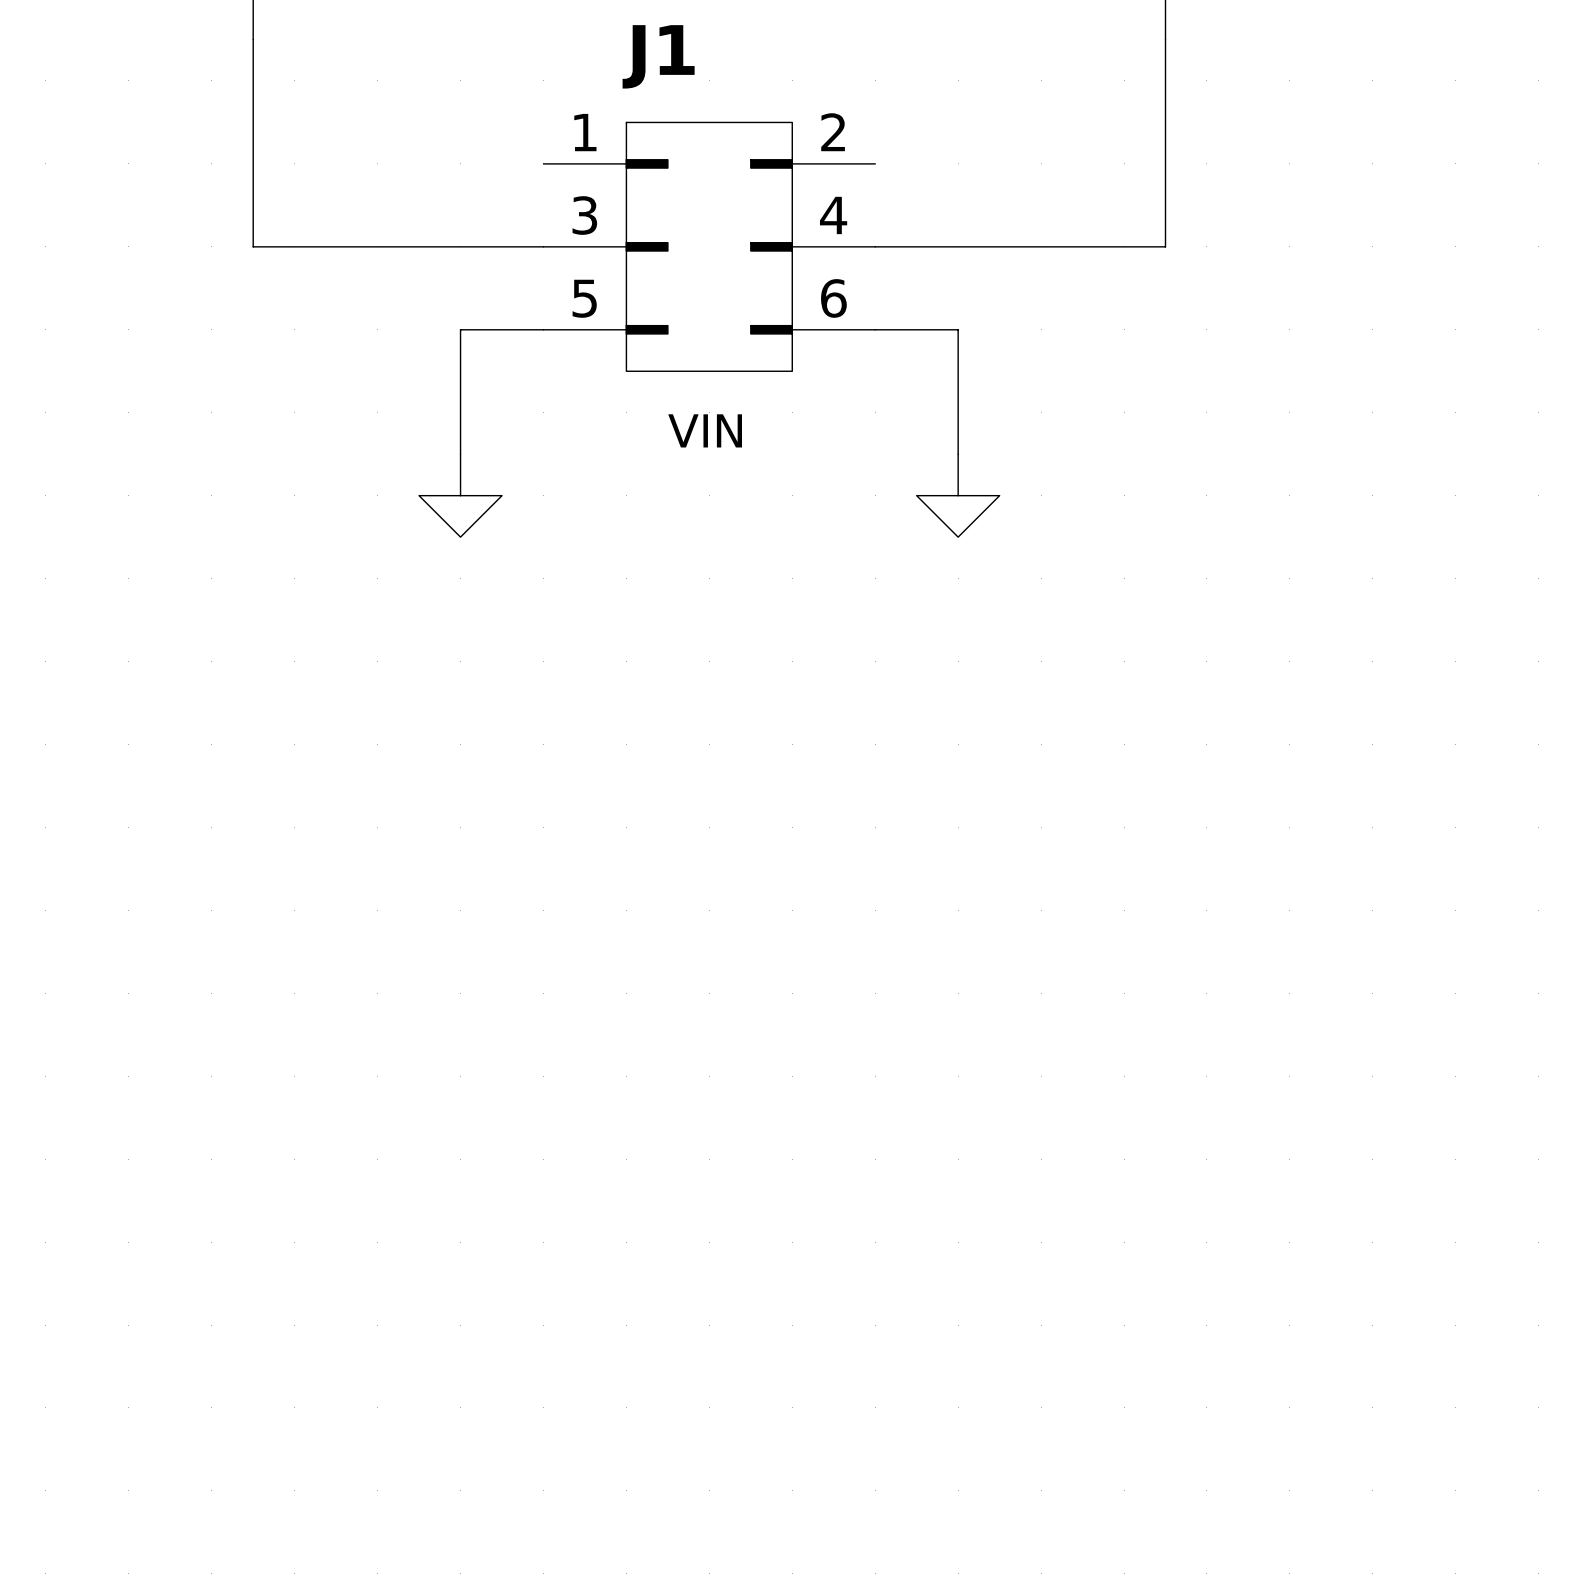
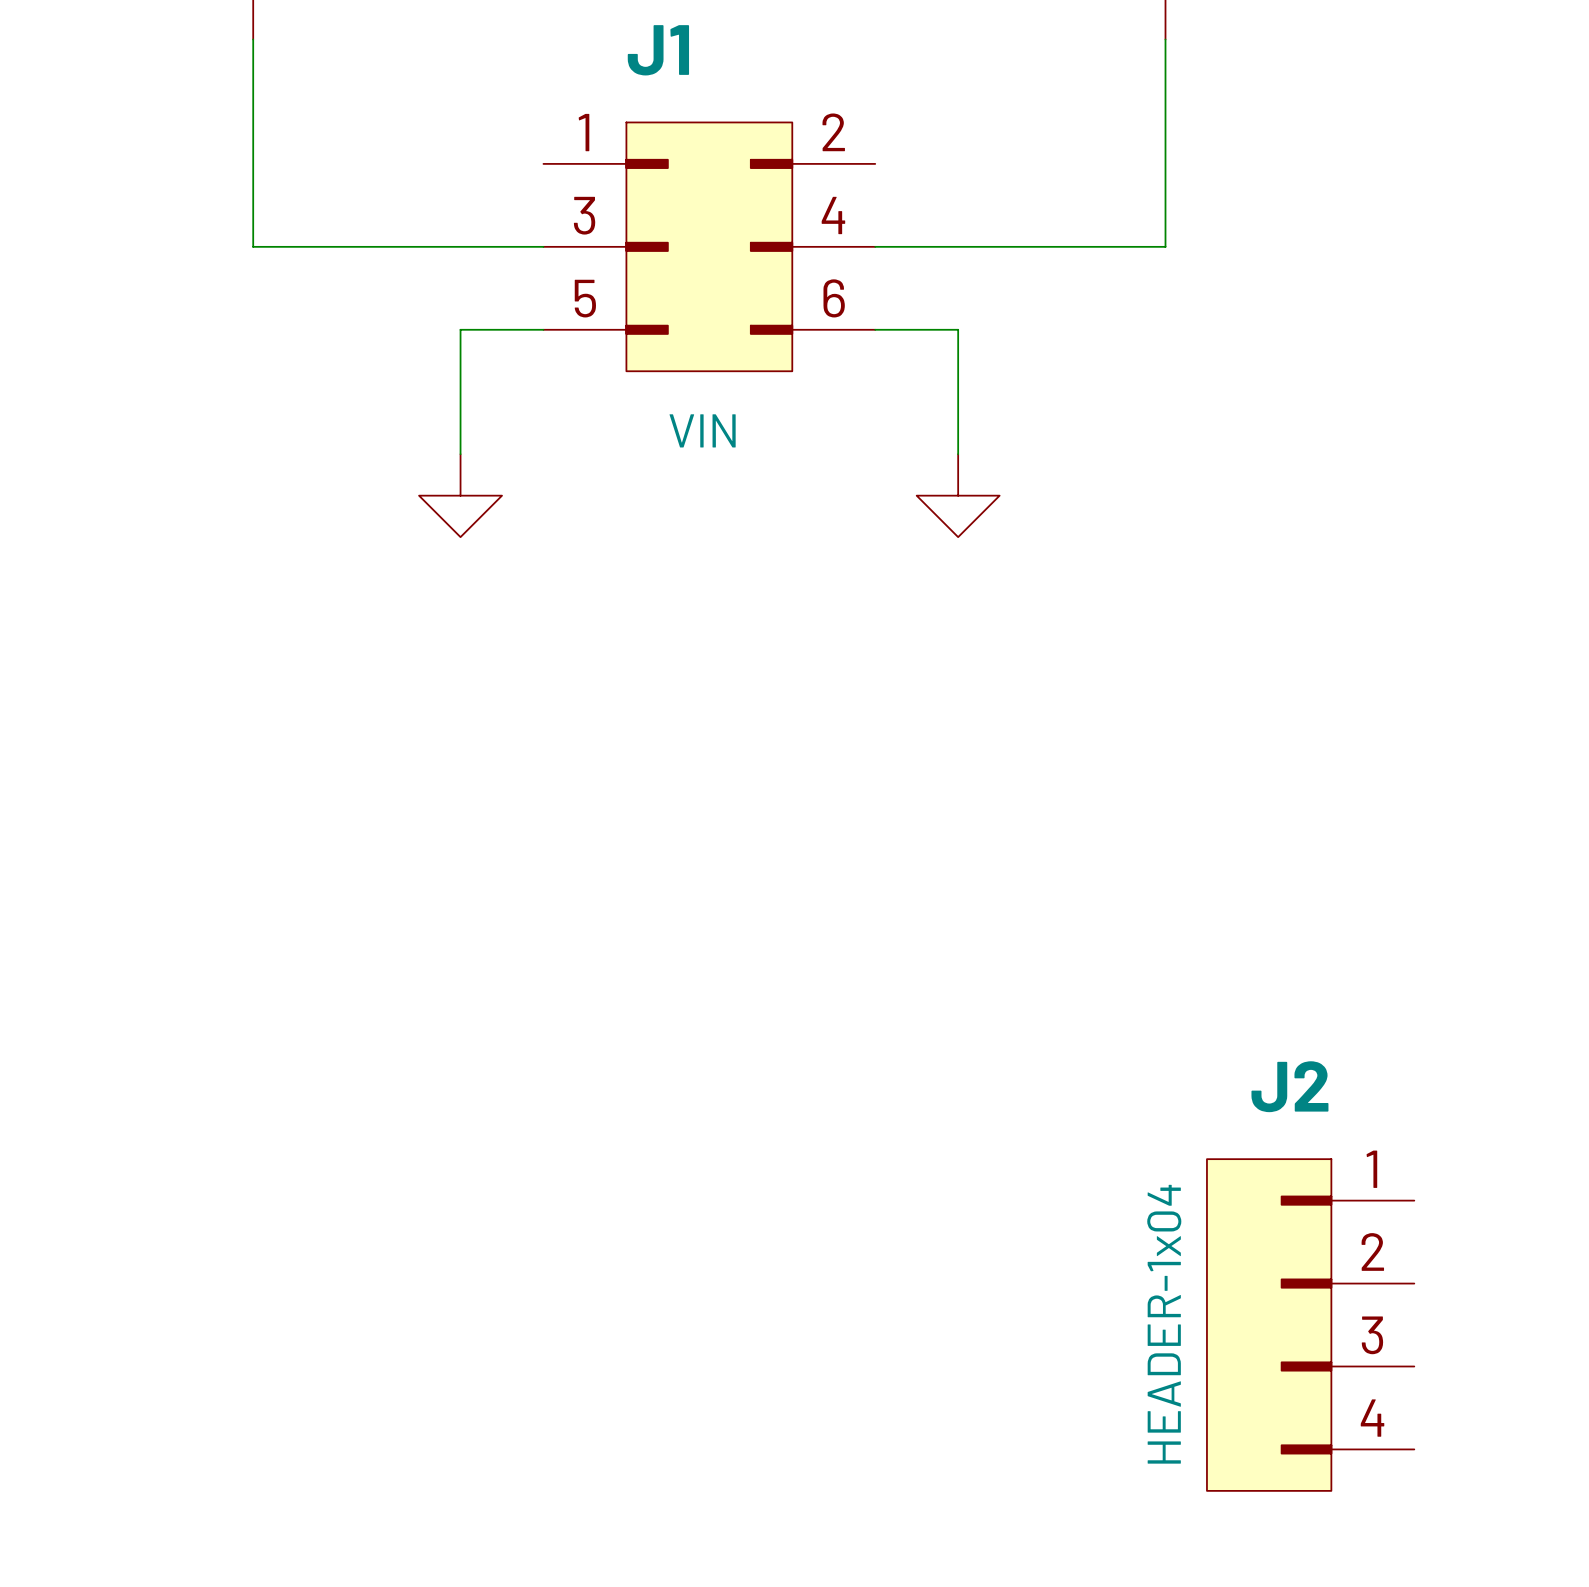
J2: none -> HEADER-1x04 (1310, 1325)

